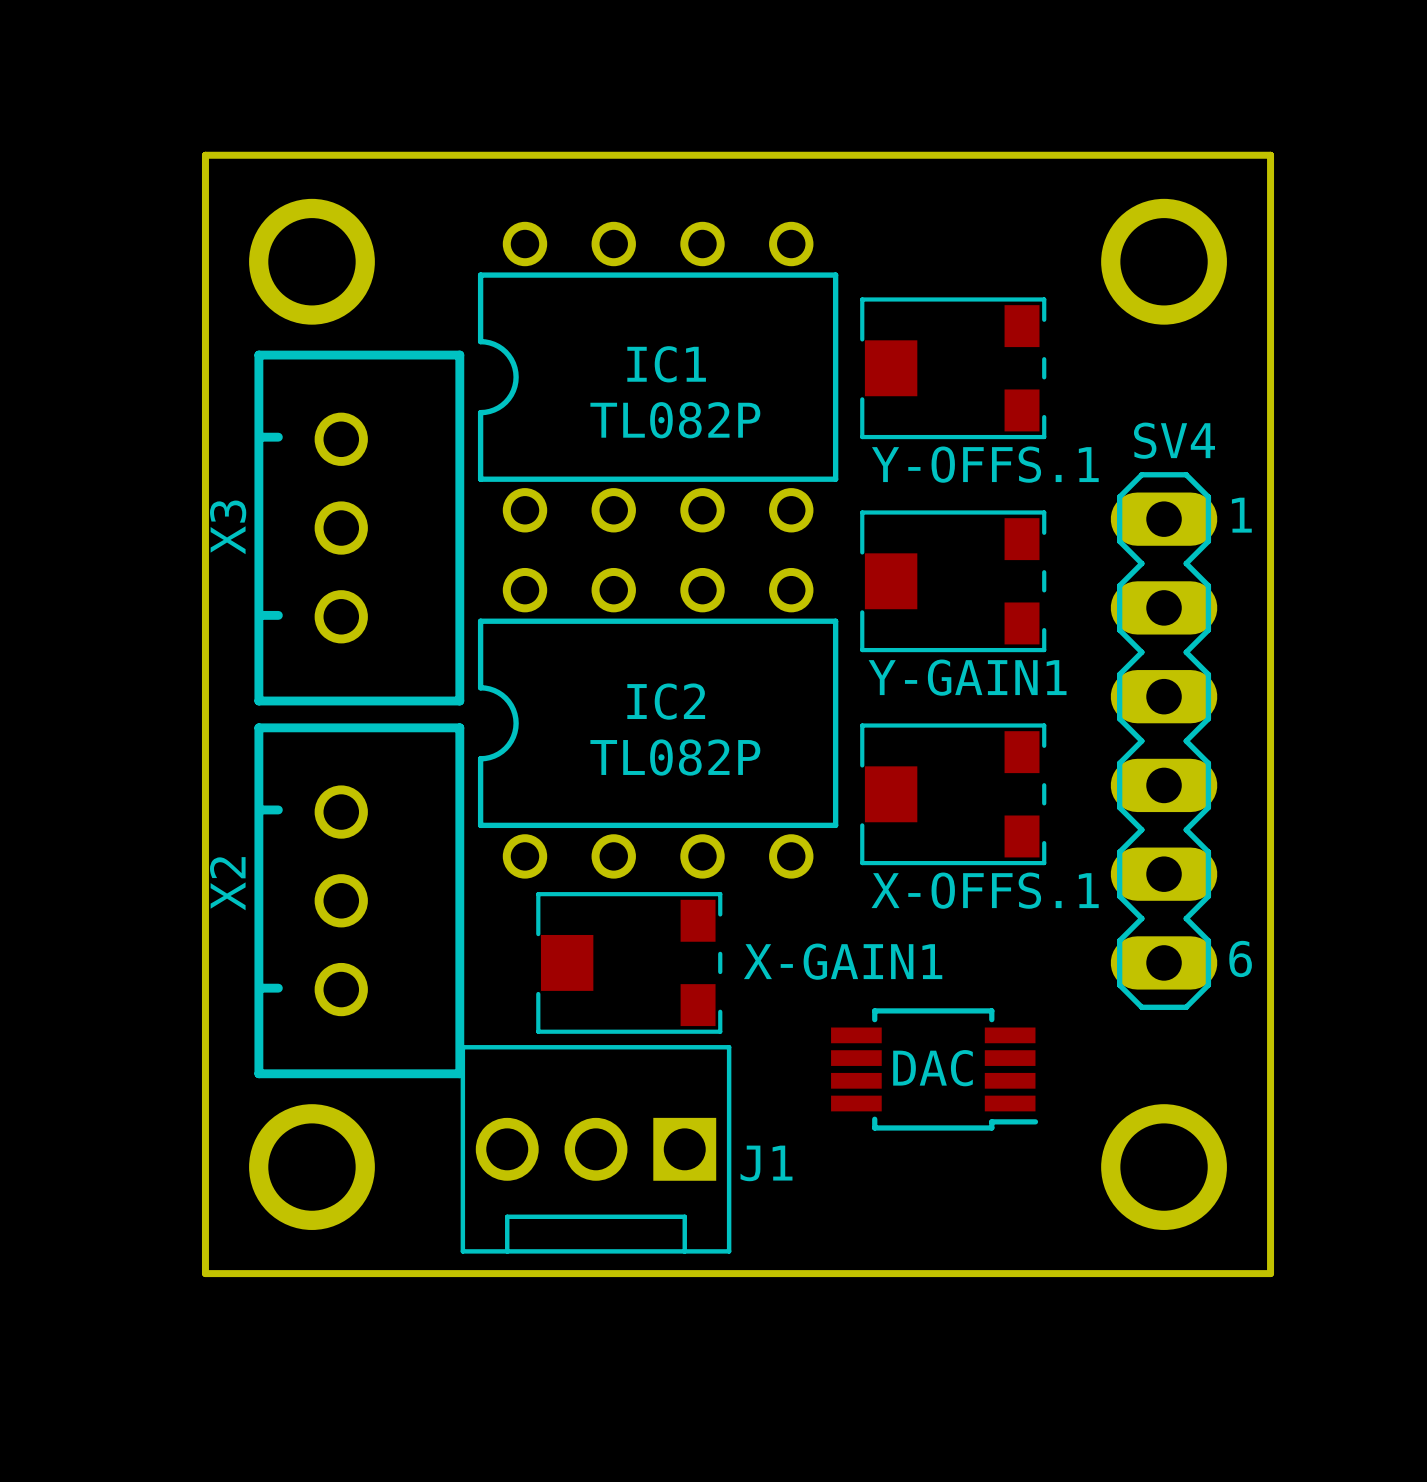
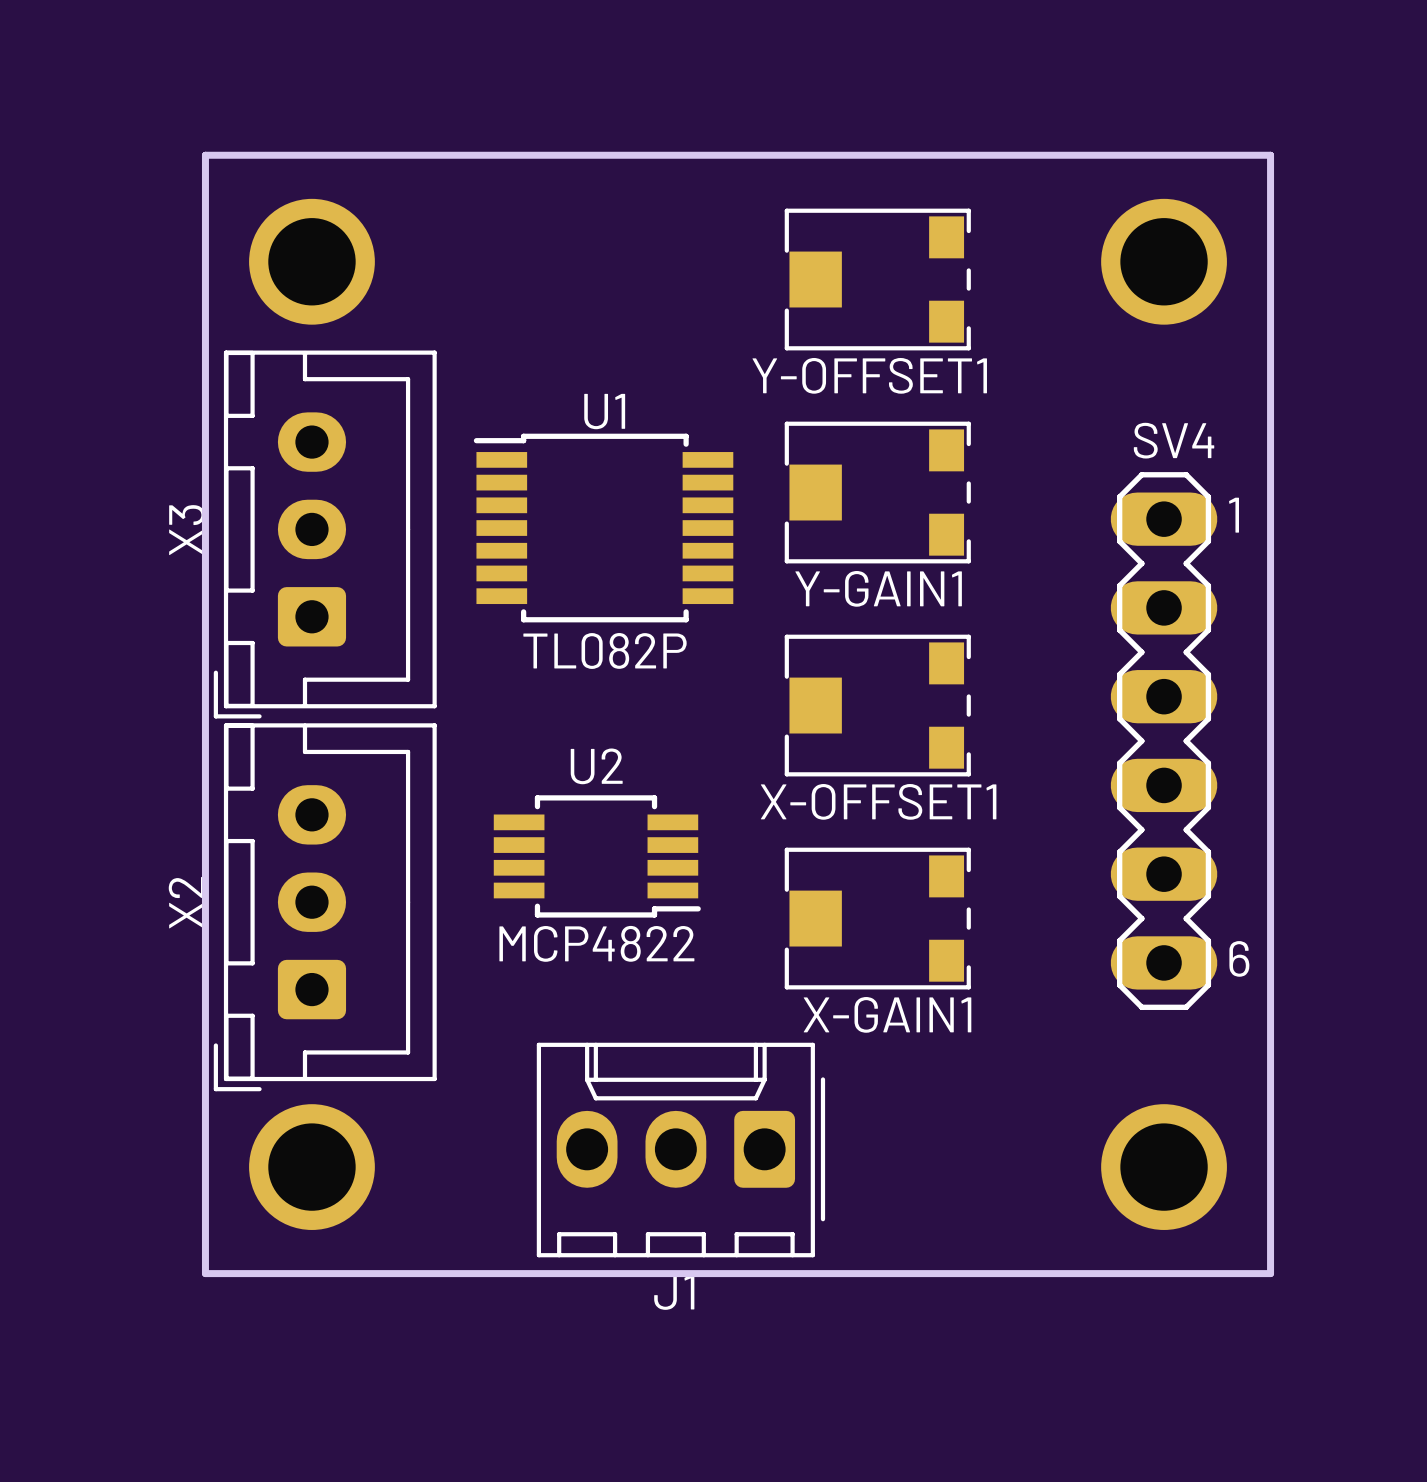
Y-OFFSET1: none -> (877, 279)
X3 footprint: [254, 350, 465, 706] -> [213, 350, 437, 719]
Y-OFFS.1: (953, 368) -> none
IC1: (658, 377) -> none
text: TL082P (675, 420) -> none
U1: none -> (603, 528)
Y-GAIN1 position: (953, 581) -> (877, 492)
text: none -> TL082P (605, 650)
Y-GAIN1 name position: Y-GAIN1 (967, 677) -> Y-GAIN1 (878, 588)
X-OFFSET1: none -> (877, 705)
X2 footprint: [254, 723, 465, 1079] -> [213, 723, 437, 1092]
IC2: (658, 723) -> none
text: TL082P (675, 757) -> none
X-OFFS.1: (953, 794) -> none
U2: none -> (597, 856)
text: none -> MCP4822 (596, 943)
X-GAIN1 name position: X-GAIN1 (843, 961) -> X-GAIN1 (887, 1014)
X-GAIN1 position: (629, 962) -> (877, 918)
J1 footprint: [460, 1045, 732, 1254] -> [536, 1042, 826, 1258]
DAC: (934, 1069) -> none
J1 name position: J1 (766, 1163) -> J1 (674, 1292)

